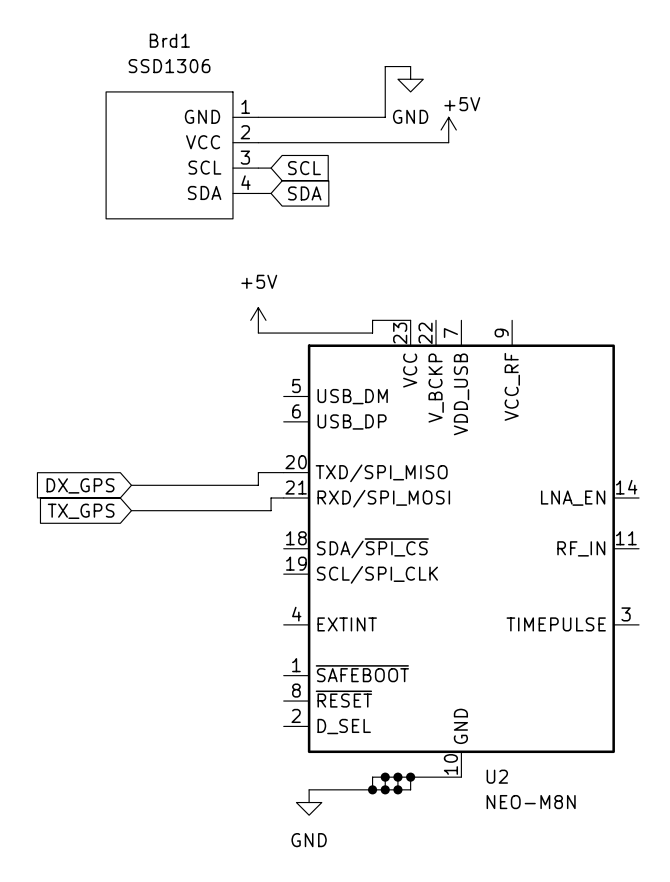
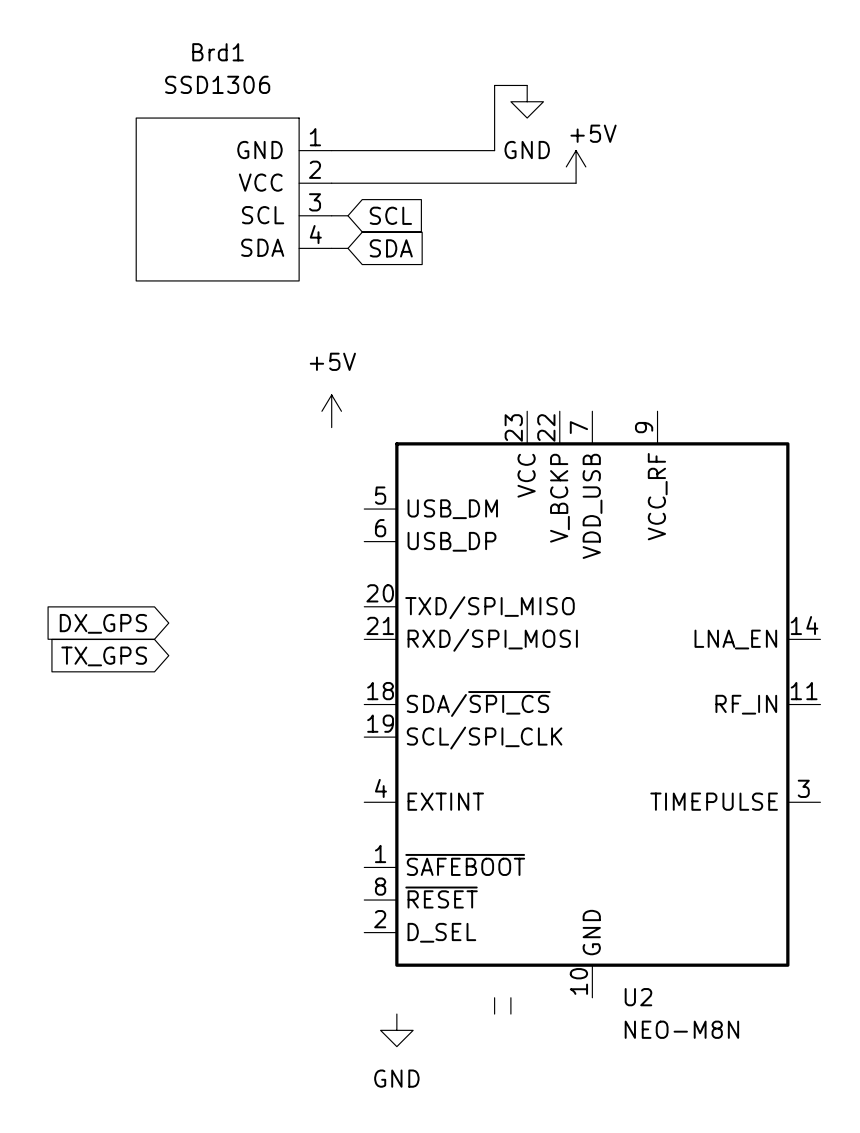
wire: (410, 320) (372, 320) (372, 333) (258, 333) -> none
wire: (283, 472) (258, 472) (258, 485) (131, 485) -> none
wire: (283, 498) (271, 498) (271, 510) (131, 510) -> none
junction: (385, 777) -> none
junction: (397, 777) -> none
wire: (410, 777) (410, 789) (309, 789) -> none
junction: (410, 777) -> none
wire: (461, 777) (372, 777) (372, 789) -> none
junction: (372, 789) -> none
junction: (385, 789) -> none
junction: (397, 789) -> none

